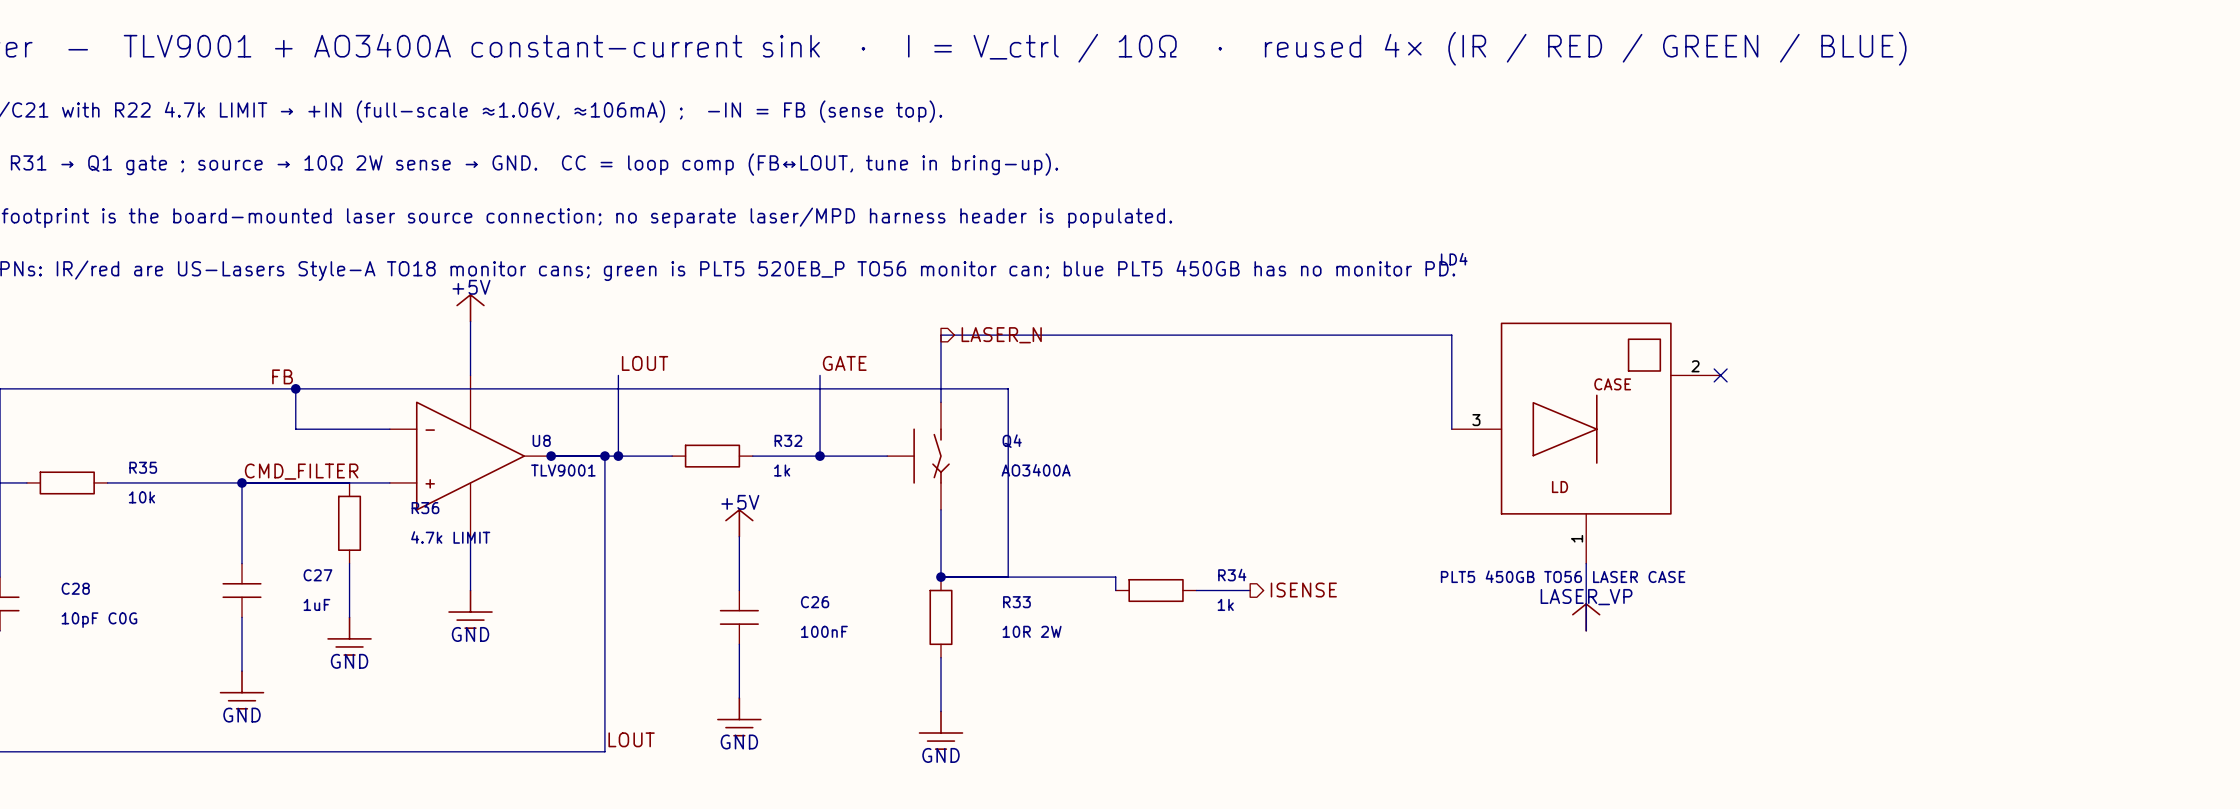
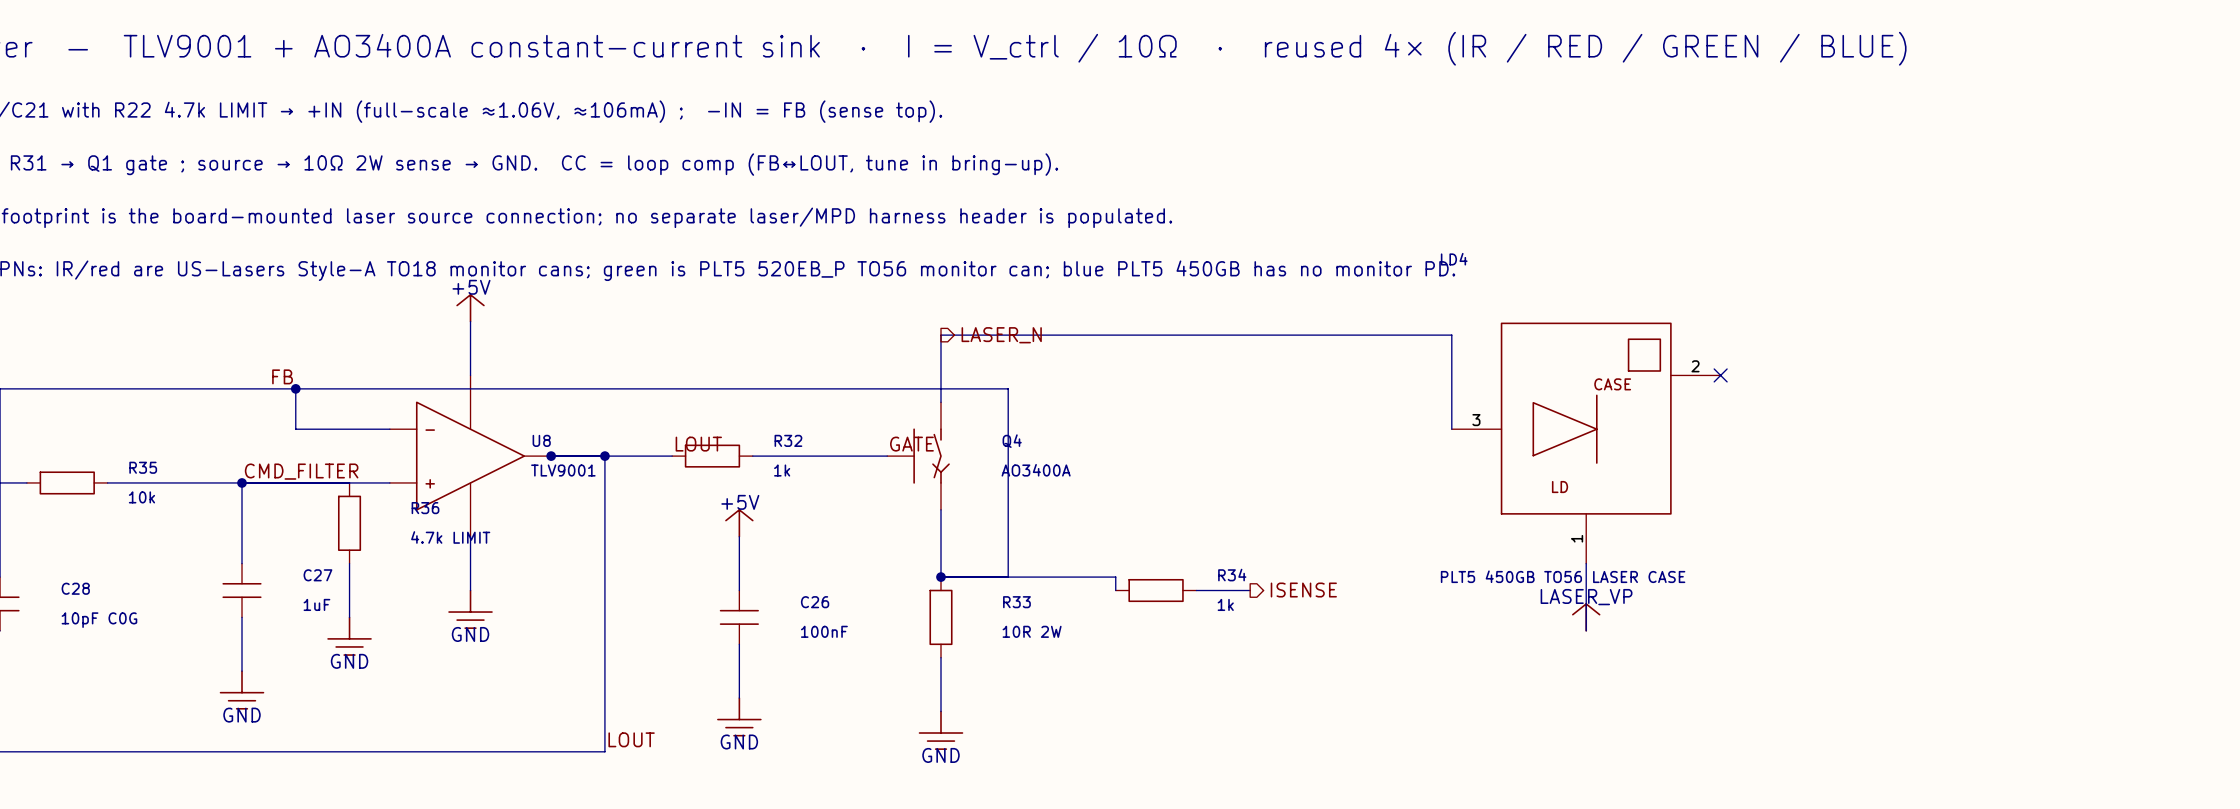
label position: LOUT (645, 363) -> LOUT (698, 444)
label position: GATE (844, 363) -> GATE (911, 444)
wire: (618, 375) (618, 456) -> none
wire: (820, 375) (820, 456) -> none
junction: (618, 456) -> none
junction: (820, 456) -> none

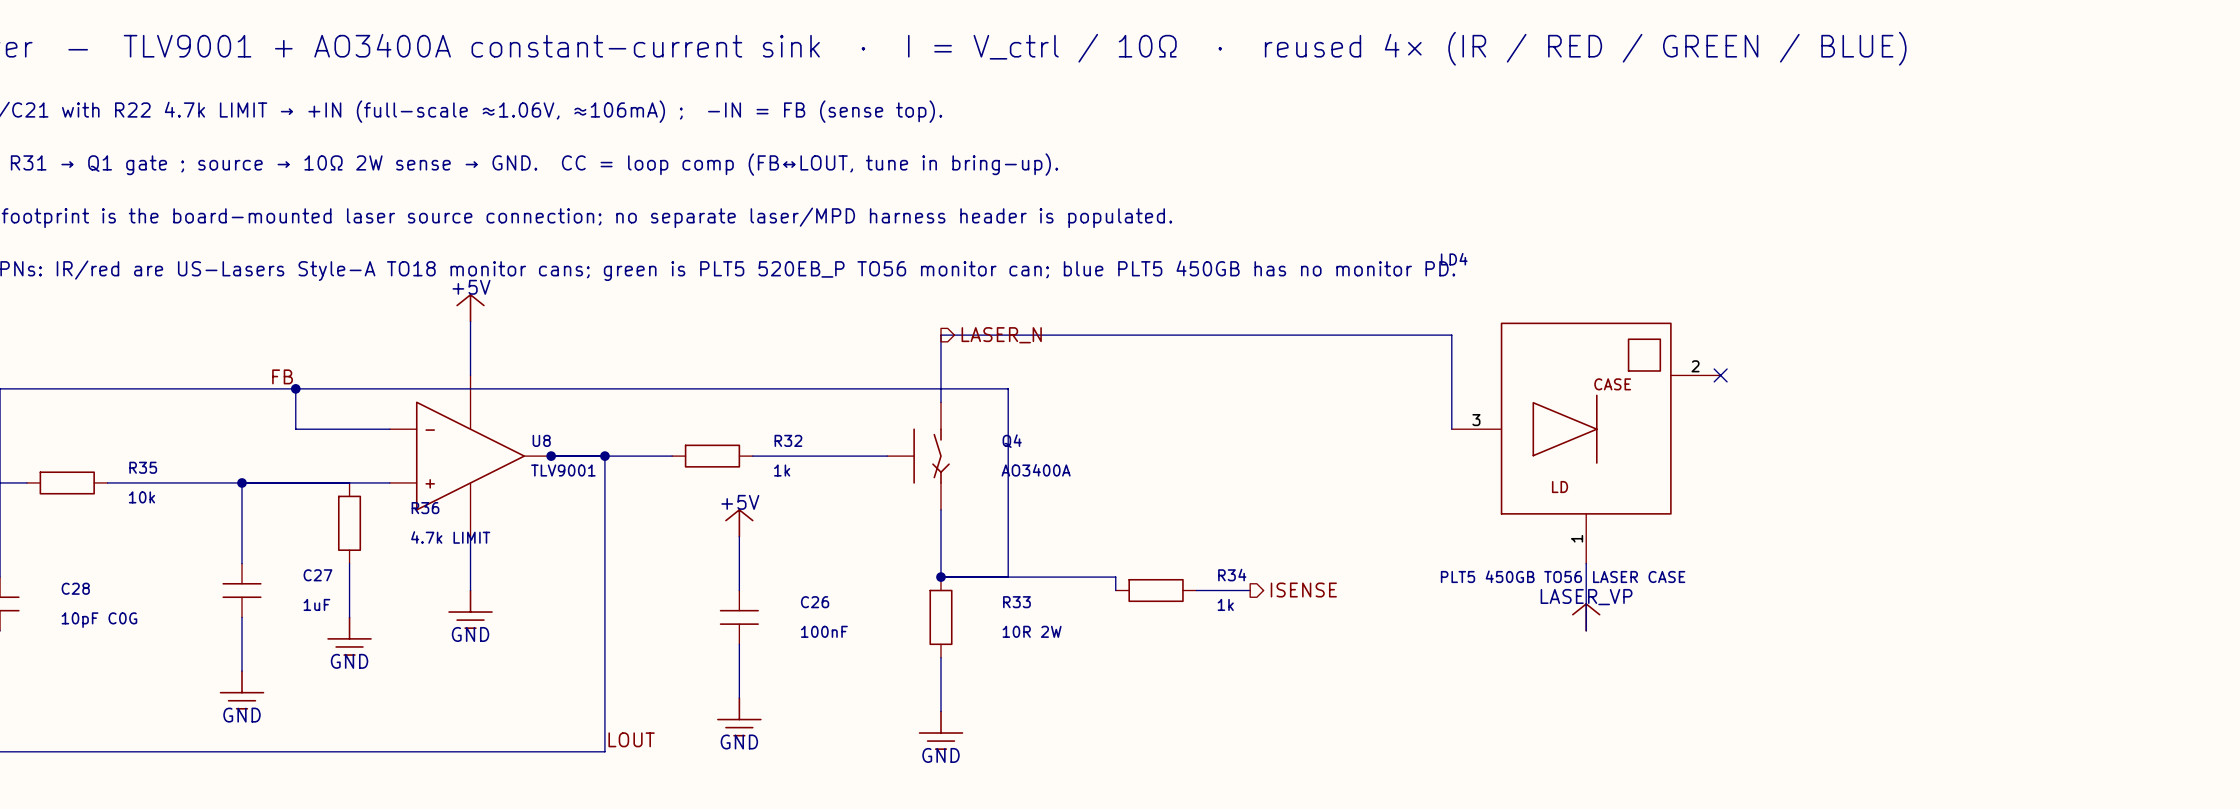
label: LOUT (698, 444) -> none
label: GATE (911, 444) -> none
label: CMD_FILTER (301, 471) -> none

